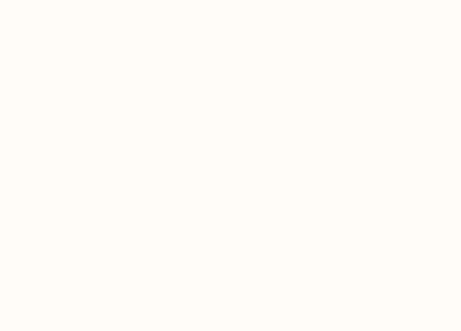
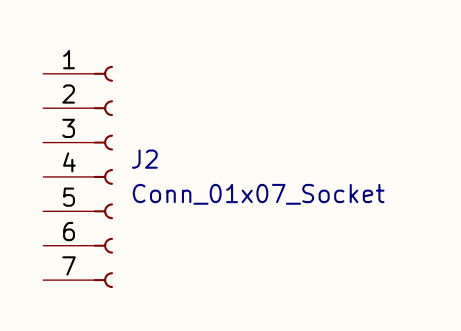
J2: none -> Conn_01x07_Socket (78, 176)

